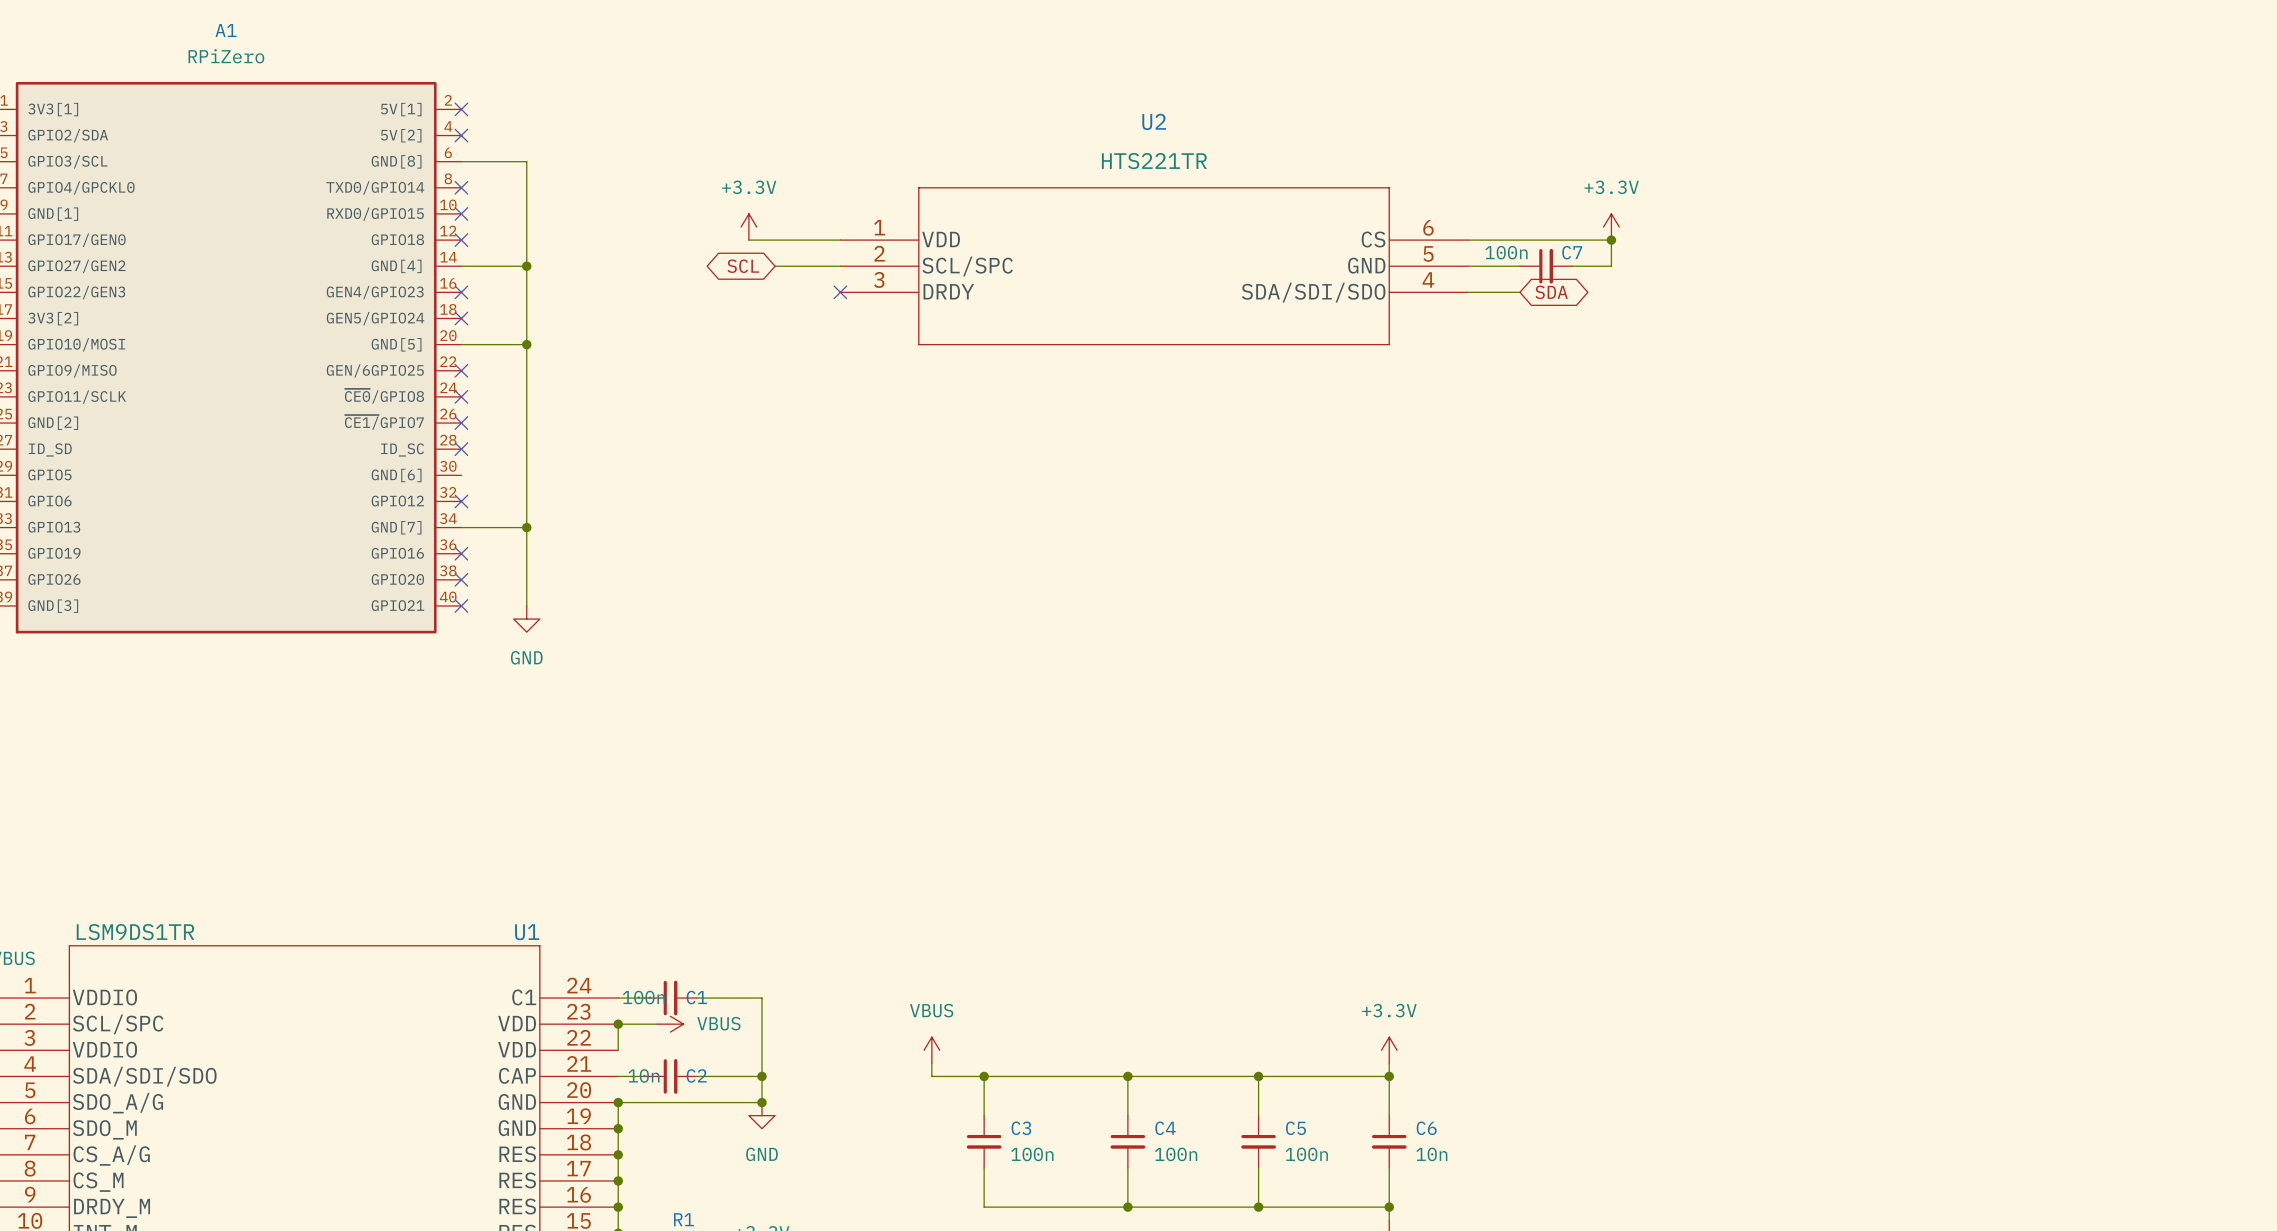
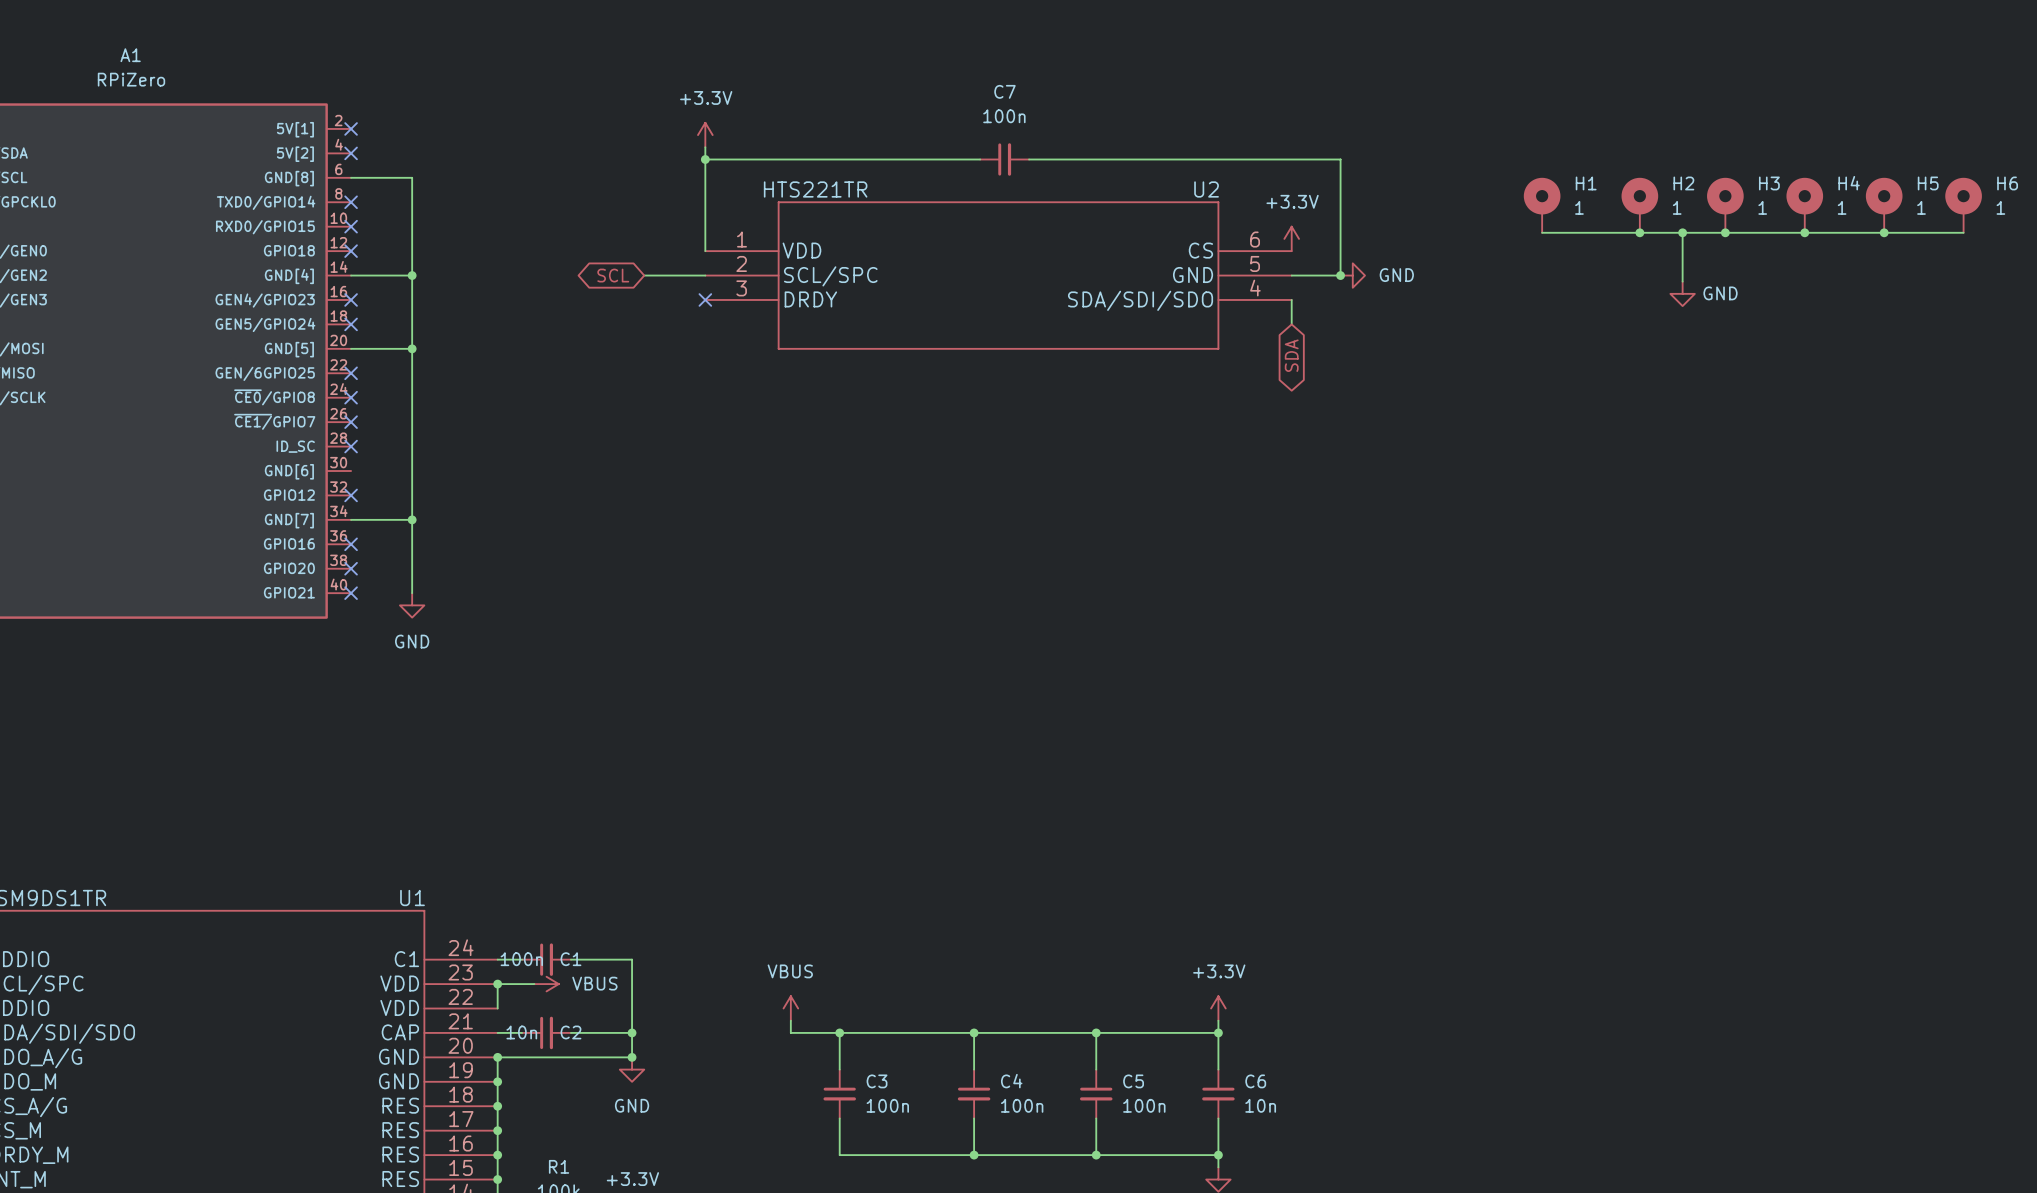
U2 name position: U2 (1154, 121) -> U2 (1206, 189)
wire: none -> (705, 159) (980, 159)
junction: none -> (705, 159)
wire: none -> (1029, 159) (1340, 159) (1340, 275)
U2 value position: HTS221TR (1154, 161) -> HTS221TR (815, 189)
H1: none -> 1 (1542, 205)
H2: none -> 1 (1639, 205)
H3: none -> 1 (1725, 205)
H4: none -> 1 (1804, 205)
H5: none -> 1 (1884, 205)
H6: none -> 1 (1963, 205)
wire: none -> (1542, 232) (1963, 232)
junction: none -> (1639, 232)
wire: none -> (1682, 232) (1682, 281)
junction: none -> (1682, 232)
junction: none -> (1725, 232)
junction: none -> (1804, 232)
junction: none -> (1884, 232)
power symbol position: +3.3V (748, 227) -> +3.3V (705, 135)
power symbol position: +3.3V (1611, 227) -> +3.3V (1291, 238)
wire: (748, 240) (840, 240) -> (705, 147) (705, 251)
wire: (1467, 240) (1611, 240) (1611, 266) (1572, 266) -> none
junction: (1611, 240) -> none
C7 value position: 100n (1506, 252) -> 100n (1004, 116)
C7 name position: C7 (1572, 252) -> C7 (1004, 91)
junction: none -> (1340, 275)
power symbol: none -> GND (1352, 275)
C7 position: (1546, 266) -> (1004, 159)
power symbol: none -> GND (1682, 293)
wire: (1467, 292) (1519, 292) -> (1291, 299) (1291, 324)
global label rotation: 0° (1551, 292) -> 90° clockwise (1291, 355)
global label position: SDA (1551, 292) -> SDA (1291, 355)

